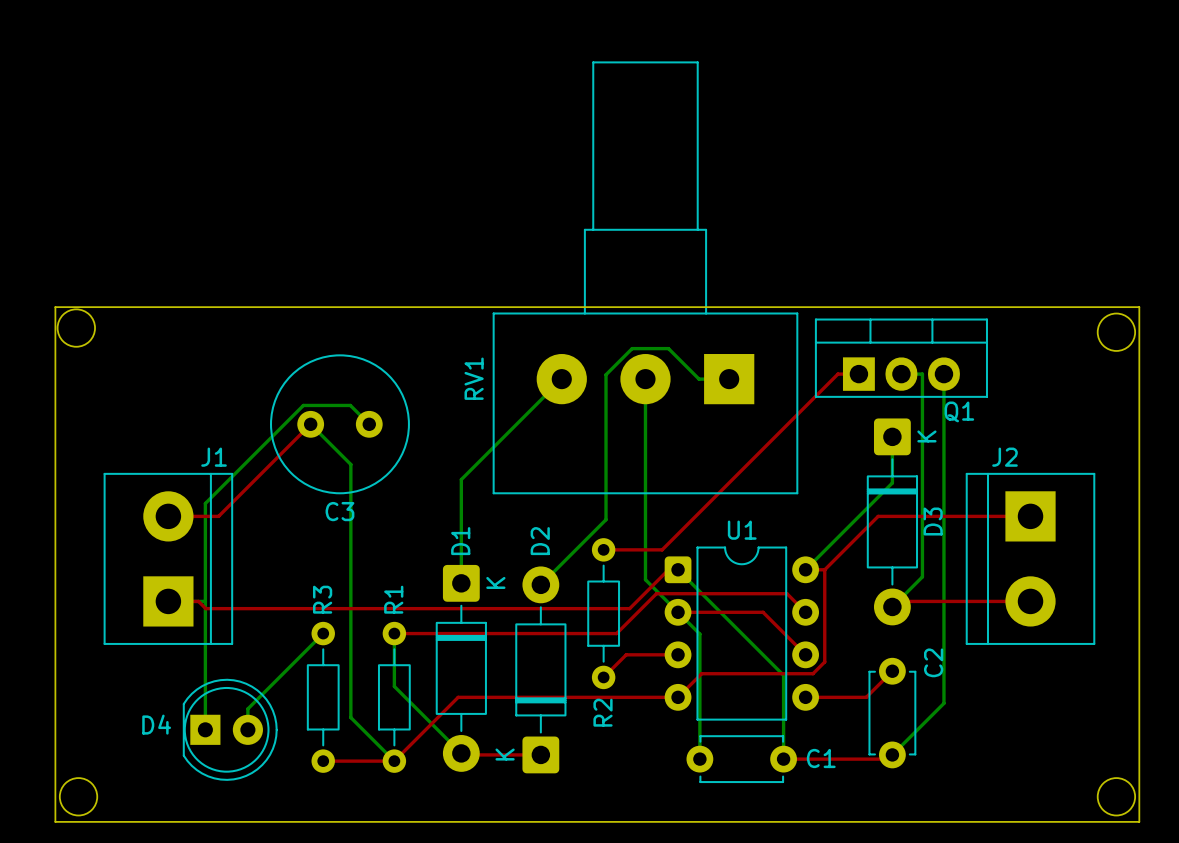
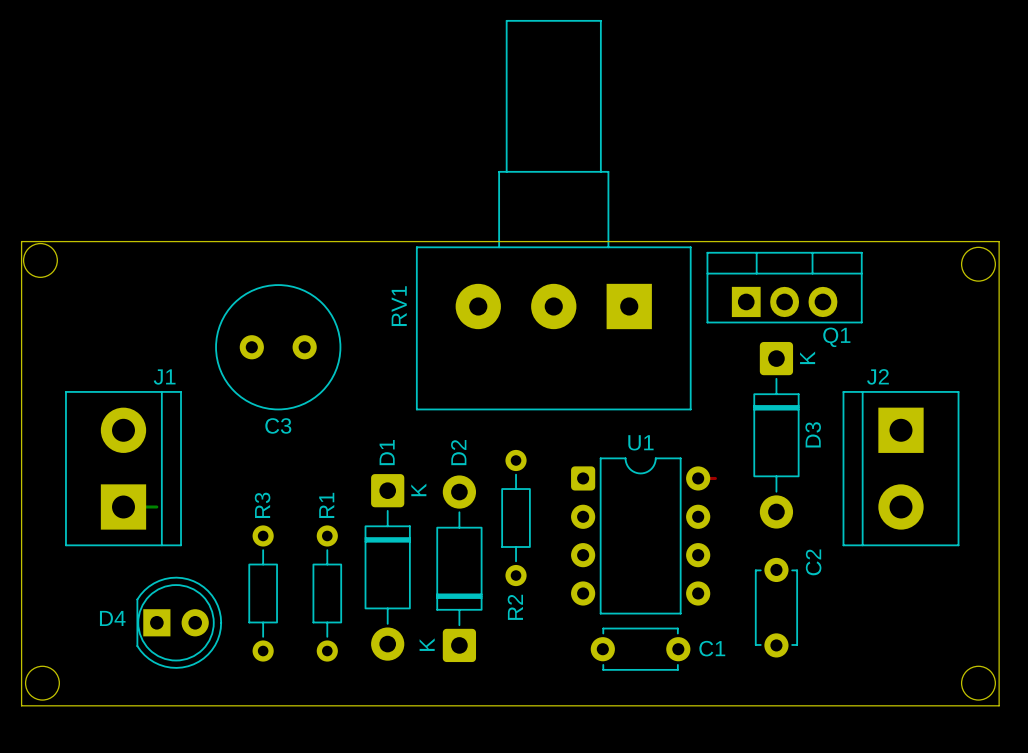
top track: (858, 374) (837, 374) (662, 549) (603, 549) -> none
bottom track: (901, 374) (922, 374) (922, 576) (892, 606) -> none
bottom track: (943, 374) (943, 703) (892, 754) -> none
bottom track: (561, 379) (461, 479) (461, 583) -> none
bottom track: (645, 379) (645, 579) (699, 634) (699, 759) -> none
bottom track: (729, 379) (699, 379) (668, 348) (632, 348) (606, 374) (606, 519) (540, 584) -> none
top track: (310, 424) (218, 516) (168, 516) -> none
bottom track: (310, 424) (350, 464) (350, 717) (394, 761) -> none
bottom track: (369, 424) (350, 405) (303, 405) (205, 503) (205, 729) -> none
bottom track: (892, 436) (892, 482) (805, 569) -> none
top track: (1030, 516) (878, 516) (824, 569) (824, 661) (813, 673) (701, 673) (678, 697) (458, 697) (394, 761) (323, 761) -> none
top track: (678, 569) (668, 569) (629, 608) (205, 608) (198, 601) (168, 601) -> none
bottom track: (678, 569) (783, 675) (783, 759) -> none
top track: (1030, 601) (897, 601) (892, 606) -> none
top track: (678, 612) (763, 612) (805, 654) -> none
top track: (805, 612) (787, 593) (656, 593) (616, 633) (394, 633) -> none
bottom track: (323, 633) (247, 708) (247, 729) -> none
bottom track: (394, 633) (394, 686) (461, 753) -> none
top track: (678, 654) (626, 654) (603, 677) -> none
top track: (892, 671) (866, 697) (805, 697) -> none
top track: (461, 753) (540, 754) -> none
top track: (892, 754) (888, 759) (783, 759) -> none

